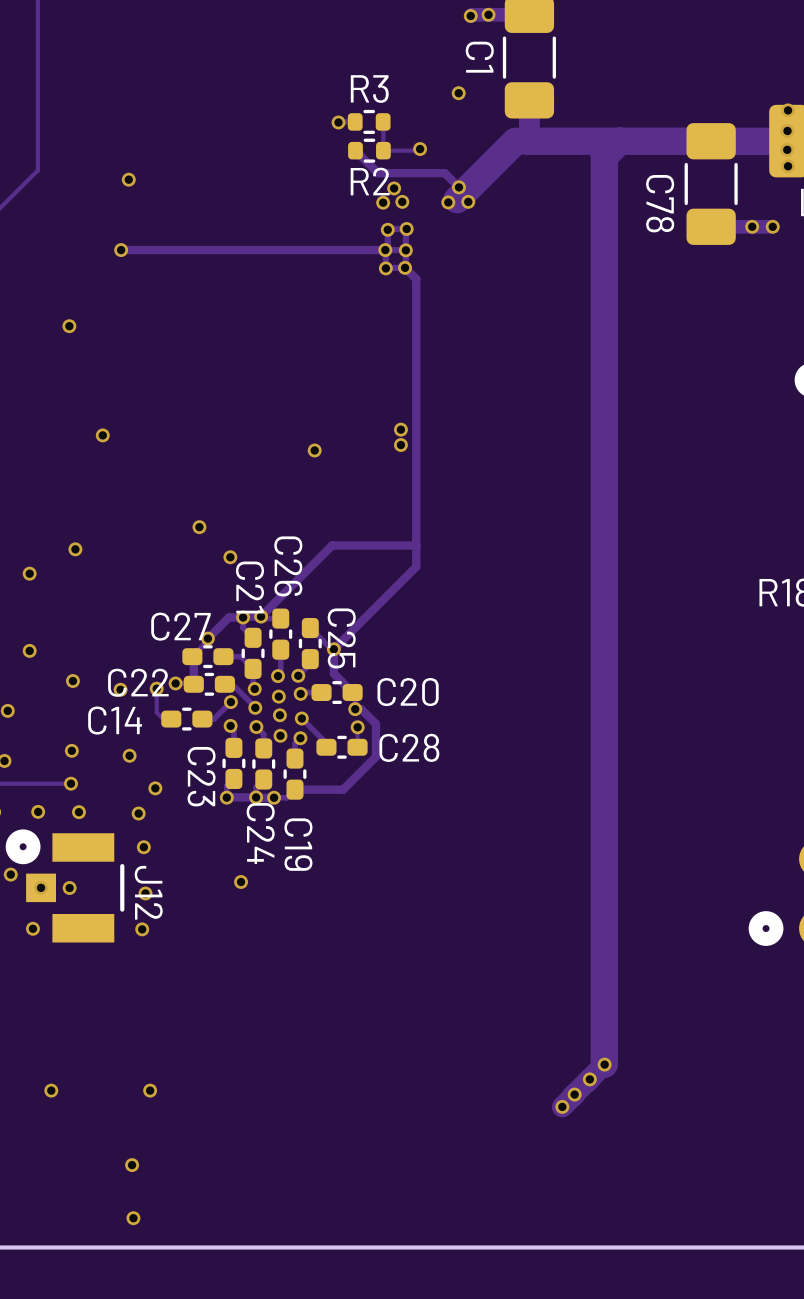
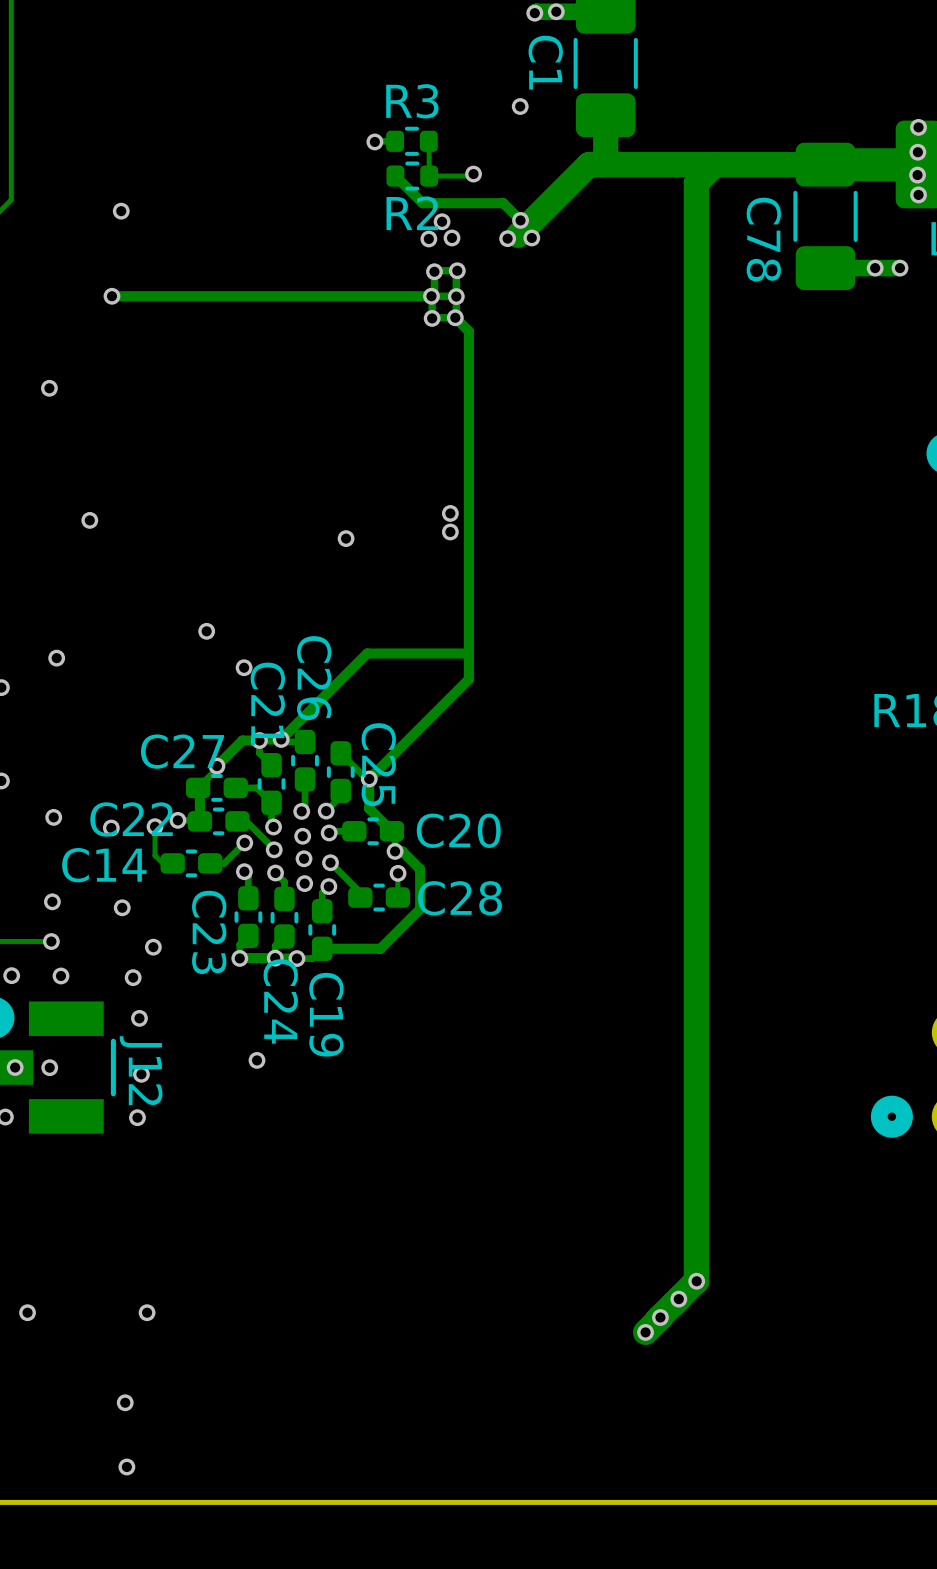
track width: thick (515, 141) (457, 199) -> thin (588, 164) (518, 235)
track width: thick (619, 141) (604, 156) (604, 1064) -> thin (714, 164) (696, 183) (696, 1280)
track width: thick (711, 141) (526, 141) -> thin (825, 164) (601, 164)

